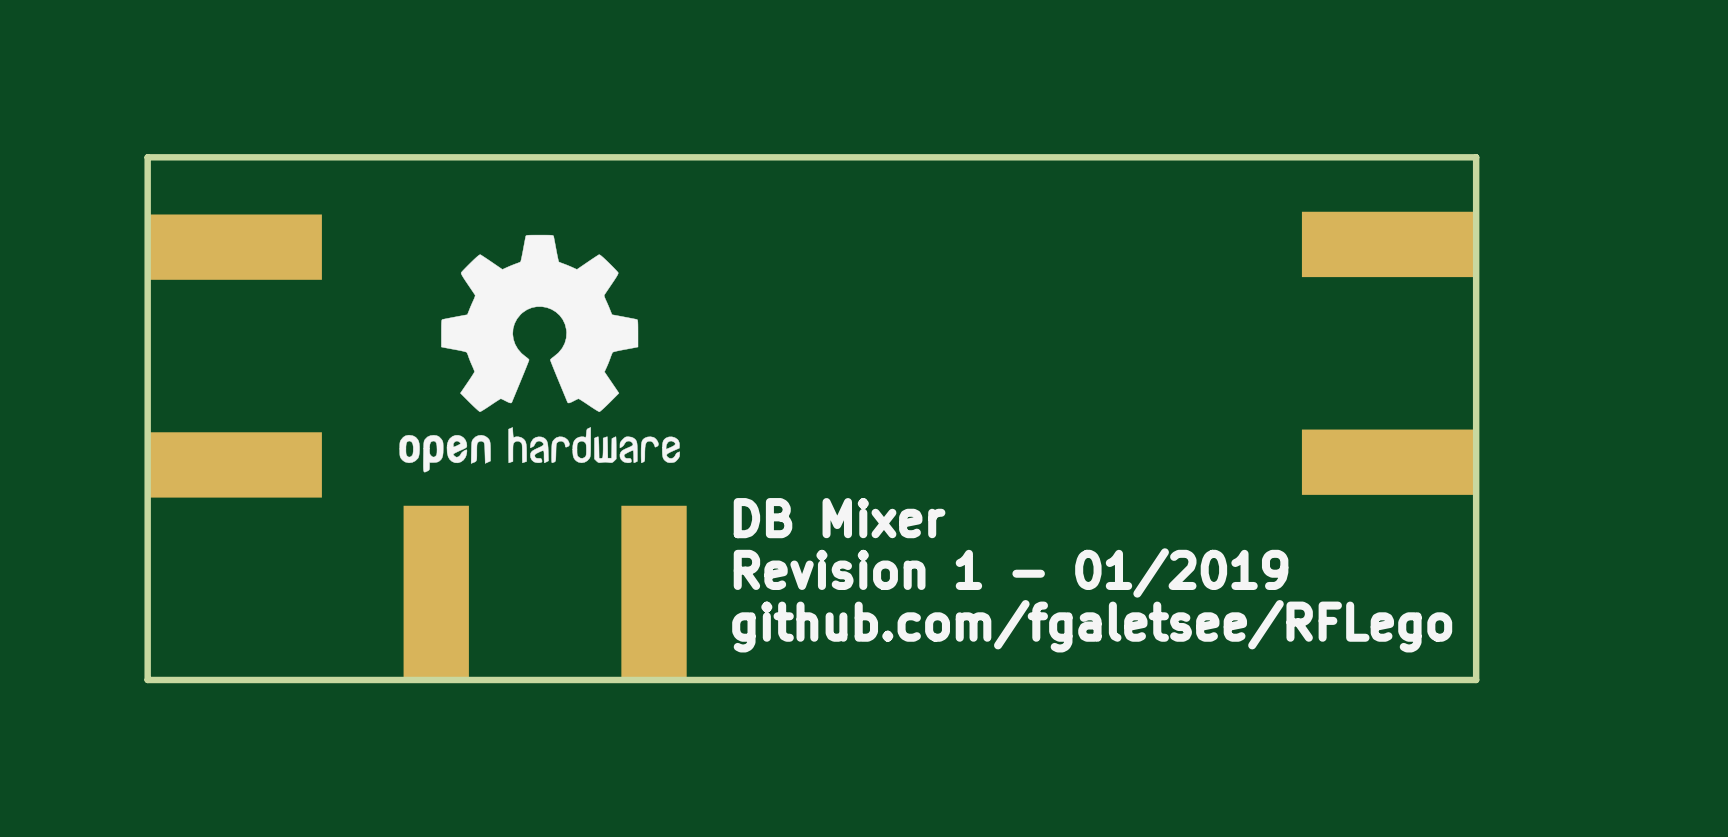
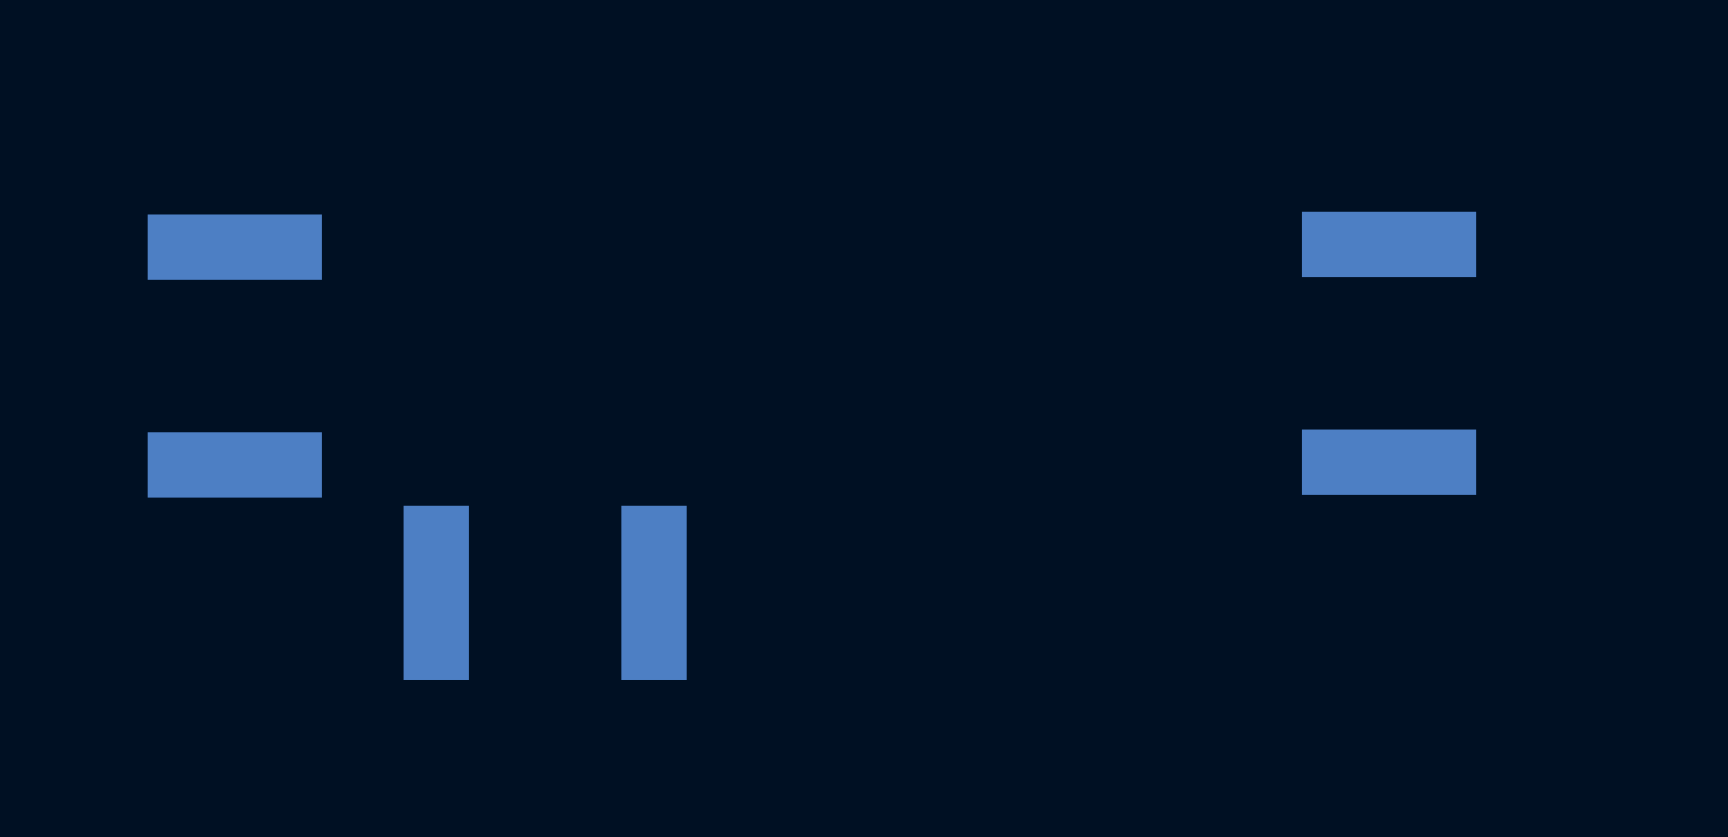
board edge: (1476, 157) (1476, 679) (147, 679) (147, 157) (1476, 157) -> none
drawing: [399, 234, 680, 473] -> none
text: DB Mixer (839, 518) -> none
text: Revision 1 - 01/2019 (1011, 572) -> none
text: github.com/fgaletsee/RFLego (1092, 626) -> none

